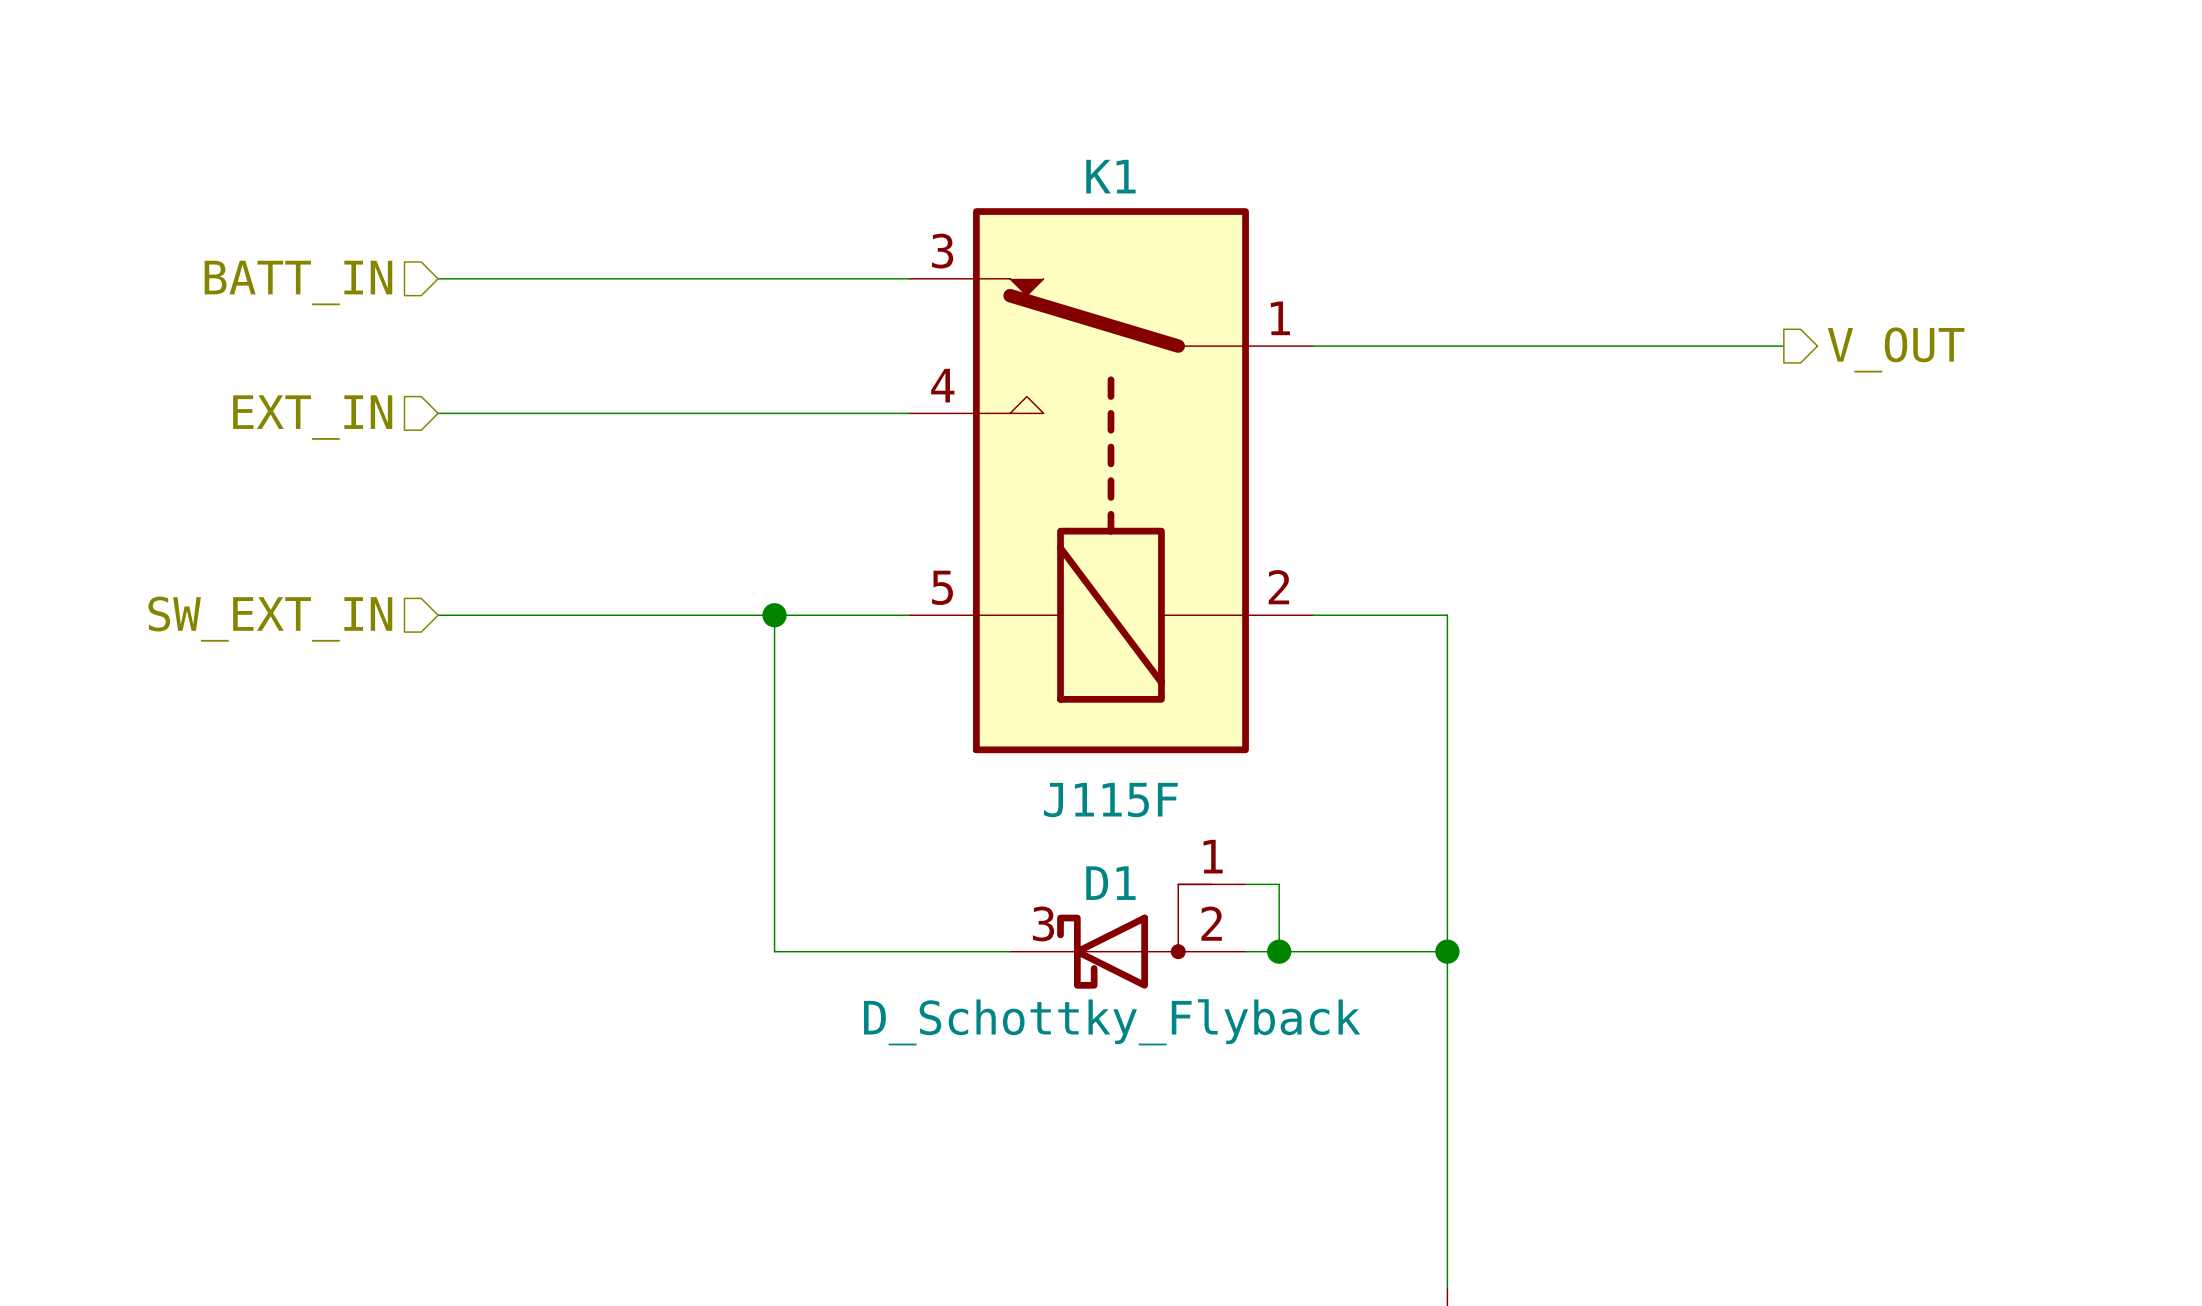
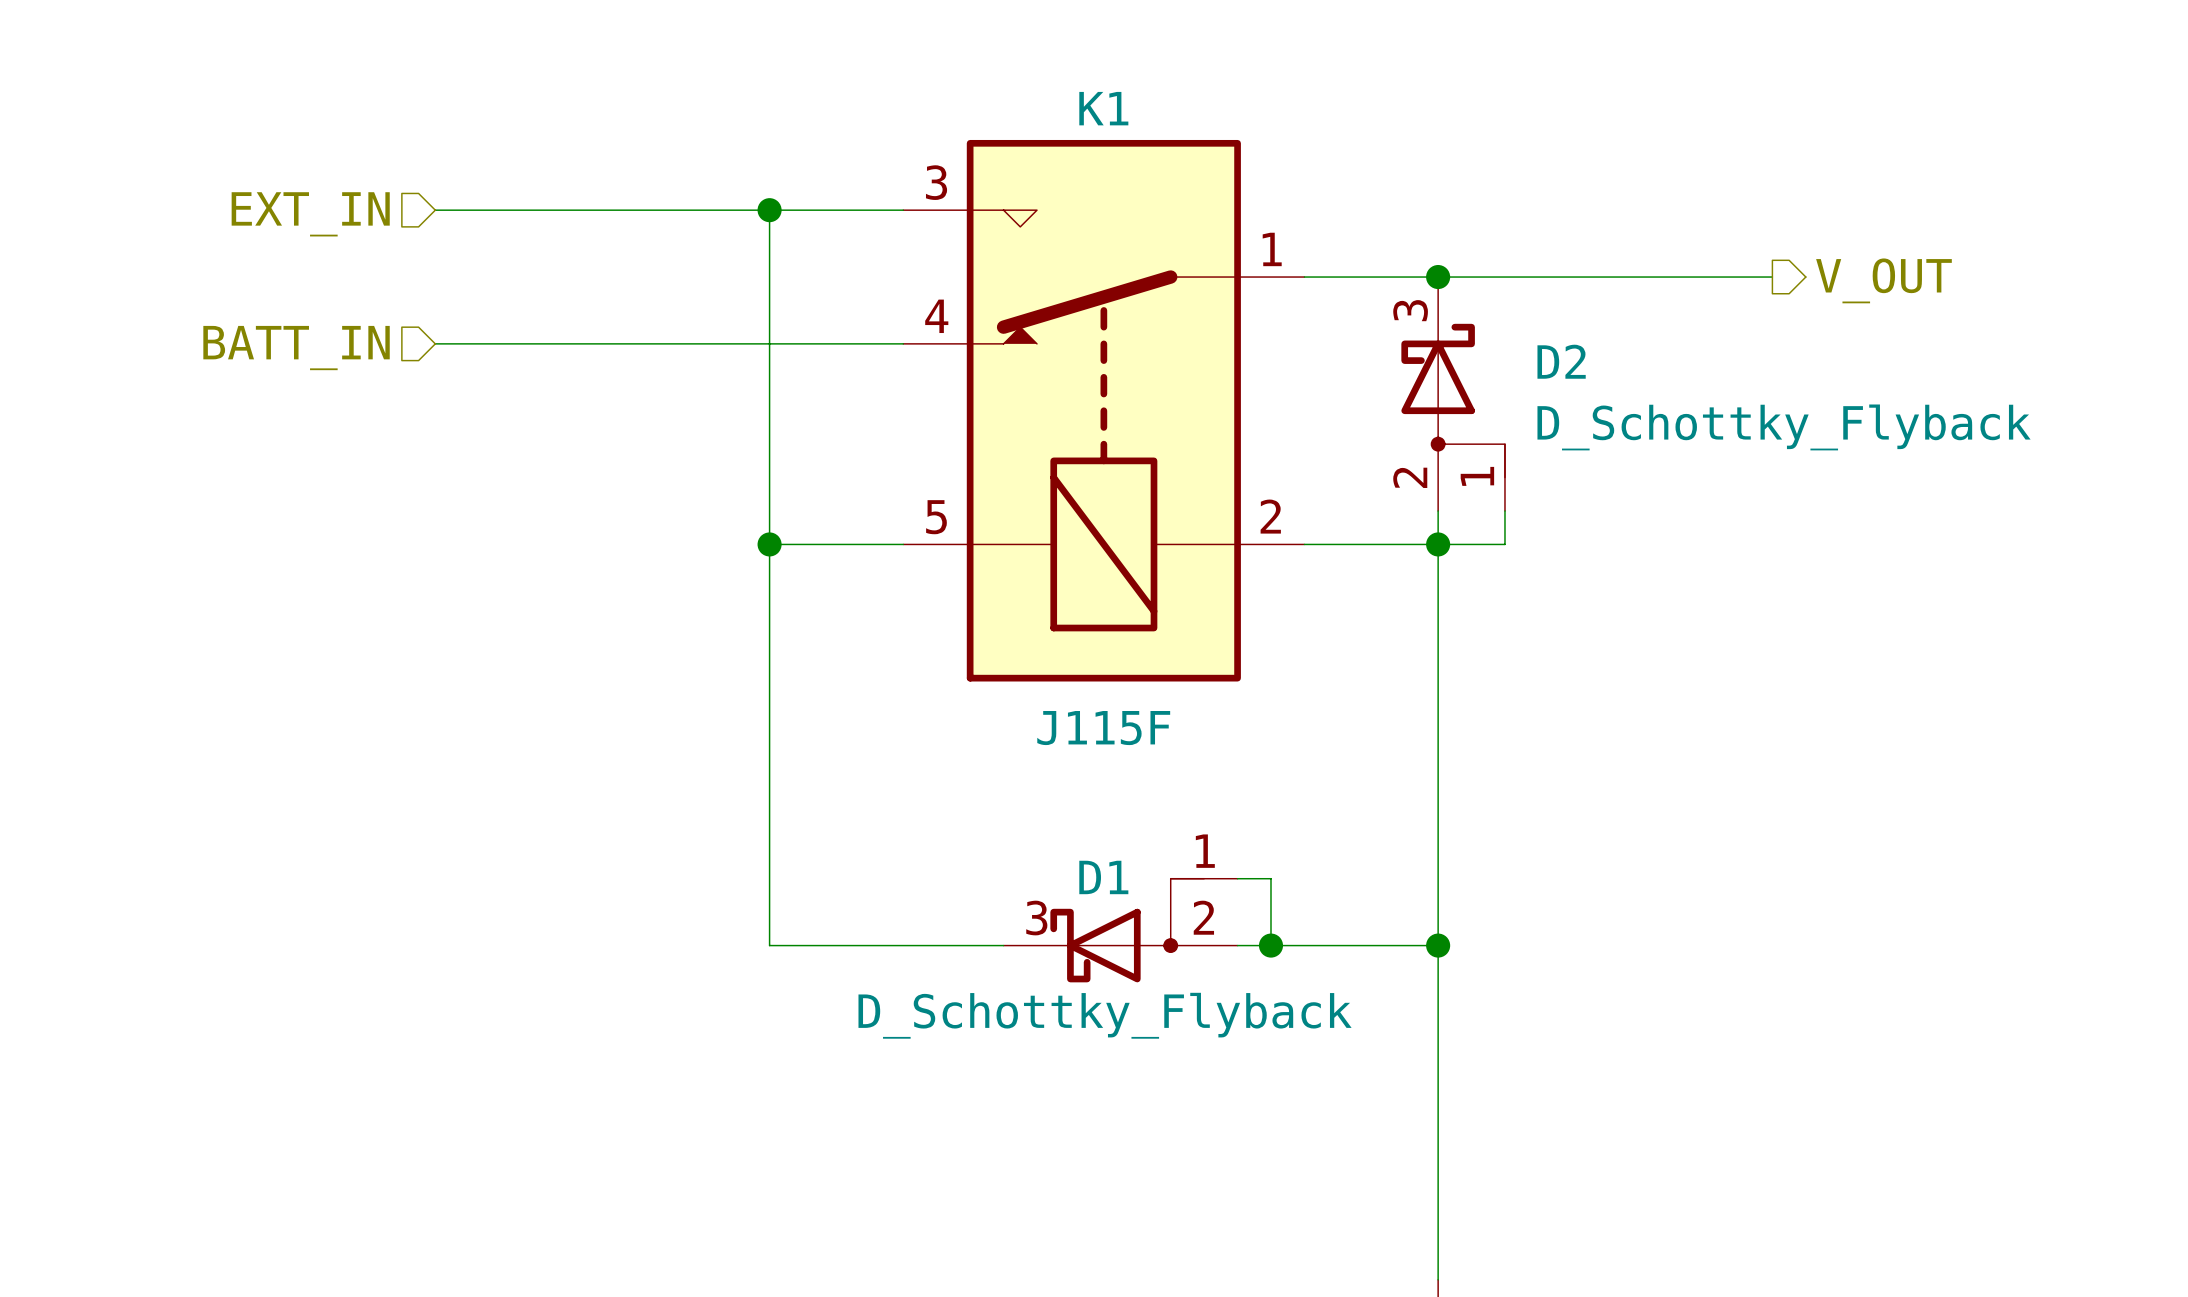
K1 symbol: [909, 208, 1313, 754] -> [903, 139, 1305, 682]
wire: none -> (769, 210) (769, 611)
junction: none -> (769, 210)
wire: (438, 278) (909, 278) -> (435, 210) (903, 210)
junction: none -> (1438, 277)
hierarchical label position: BATT_IN (298, 282) -> BATT_IN (296, 348)
wire: (1312, 346) (1783, 346) -> (1304, 277) (1772, 277)
hierarchical label position: V_OUT (1896, 349) -> V_OUT (1883, 280)
D2: none -> D_Schottky_Flyback (1453, 394)
wire: (438, 413) (909, 413) -> (435, 343) (903, 343)
hierarchical label position: EXT_IN (312, 417) -> EXT_IN (310, 214)
wire: none -> (1504, 511) (1504, 544) (1304, 544)
wire: none -> (769, 544) (903, 544)
junction: none -> (1438, 544)
wire: (438, 615) (909, 615) -> none
junction position: (774, 615) -> (769, 544)
wire: (1312, 615) (1447, 615) -> (1438, 511) (1438, 611)
hierarchical label: SW_EXT_IN (270, 619) -> none

